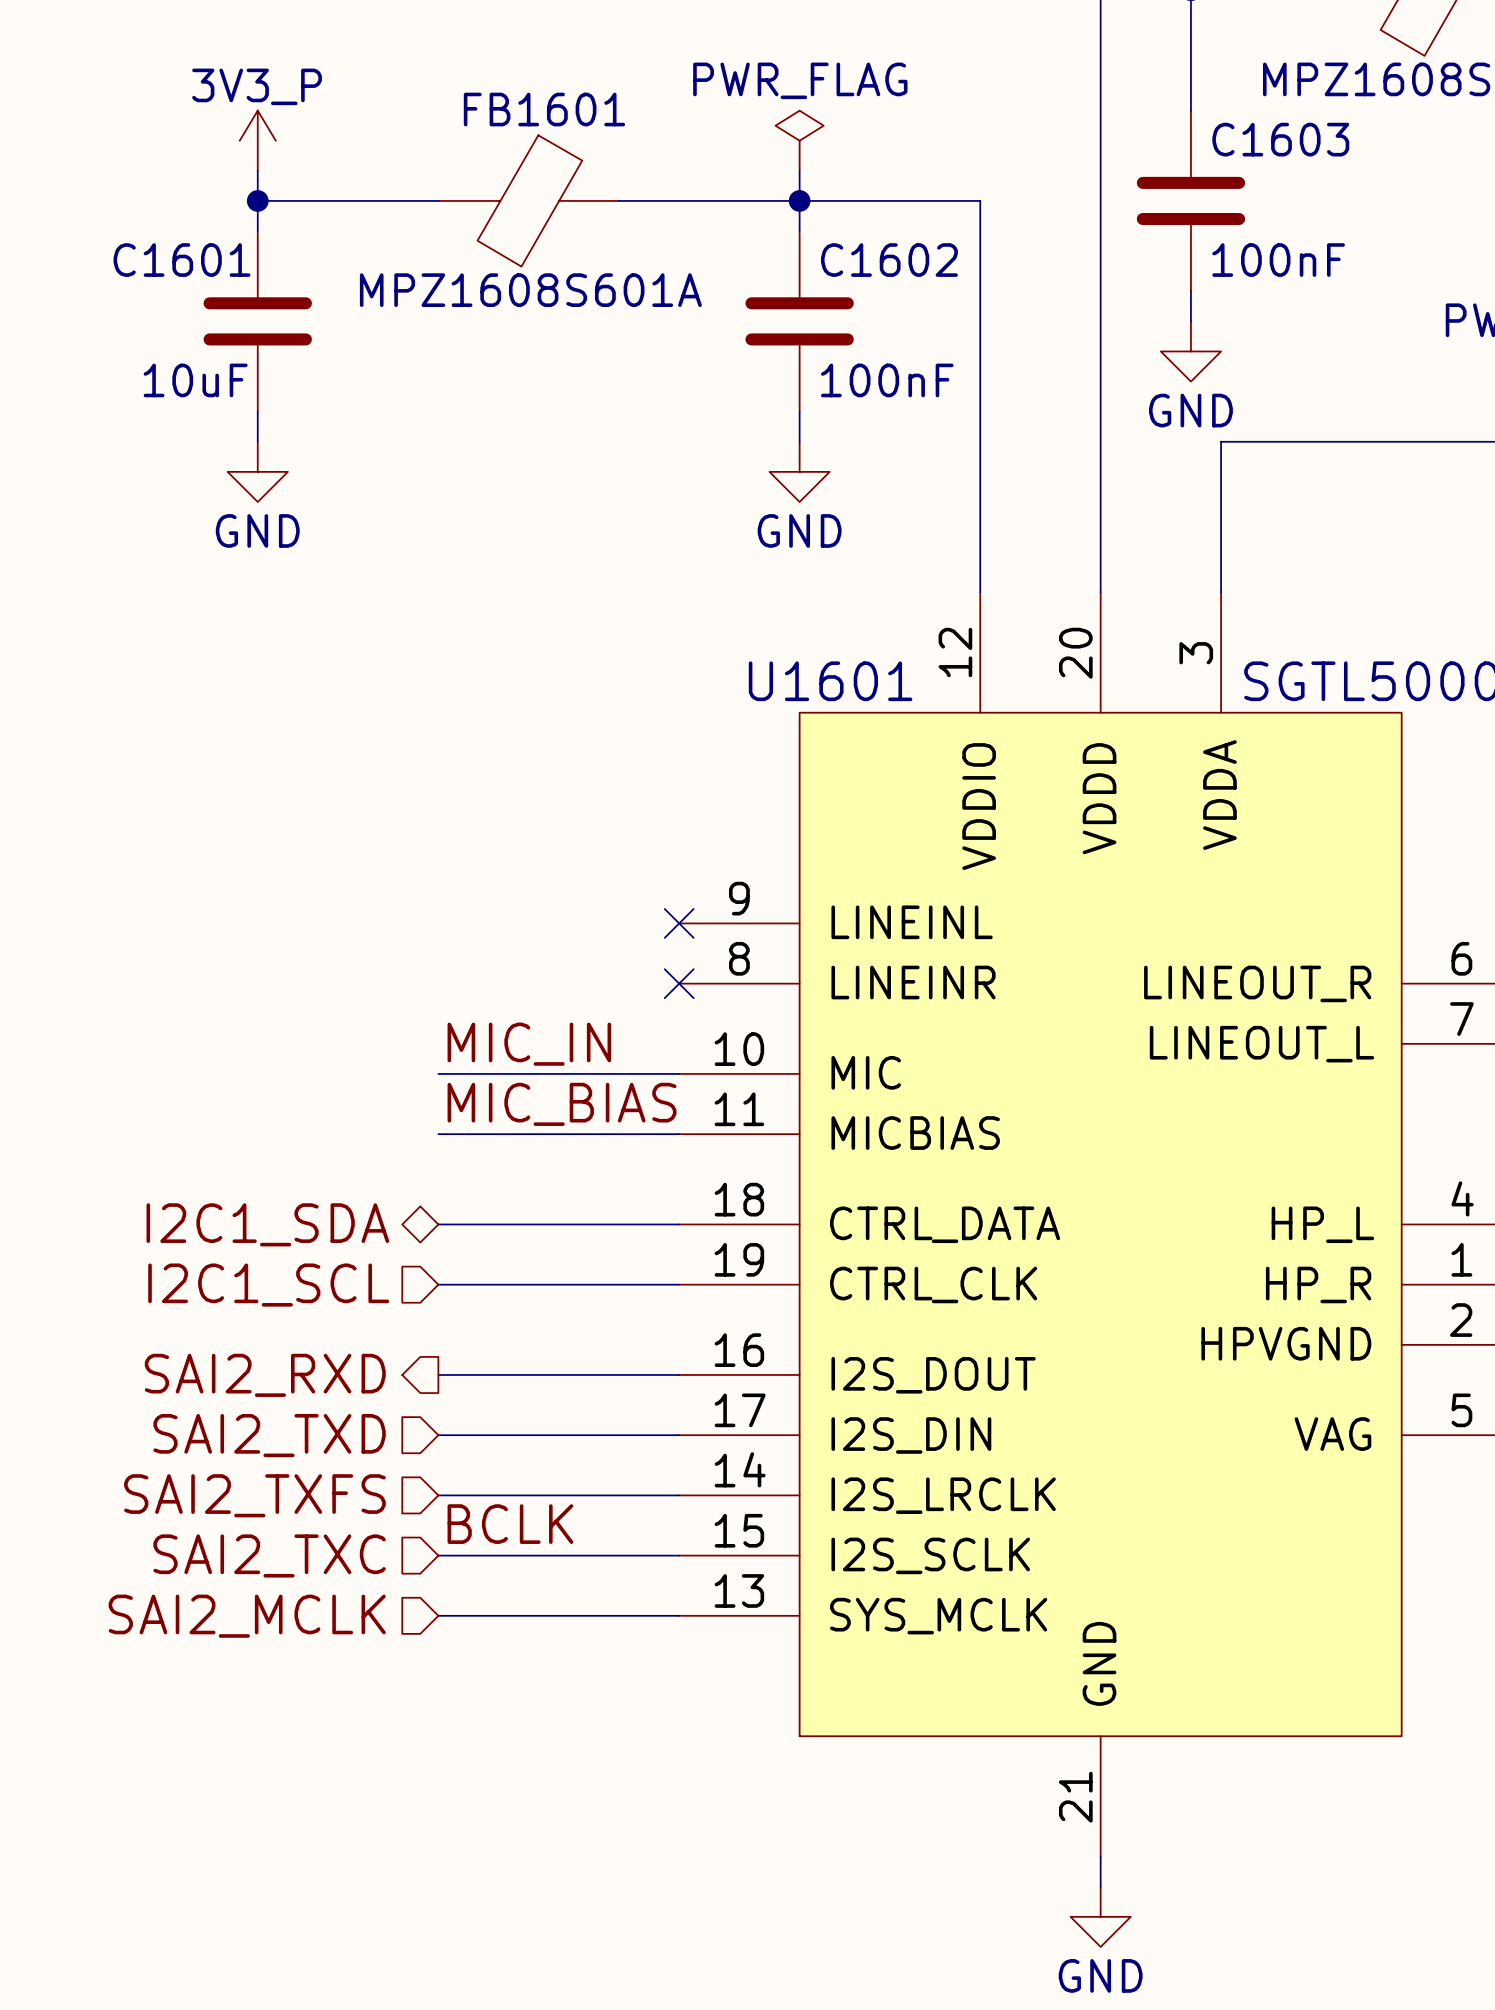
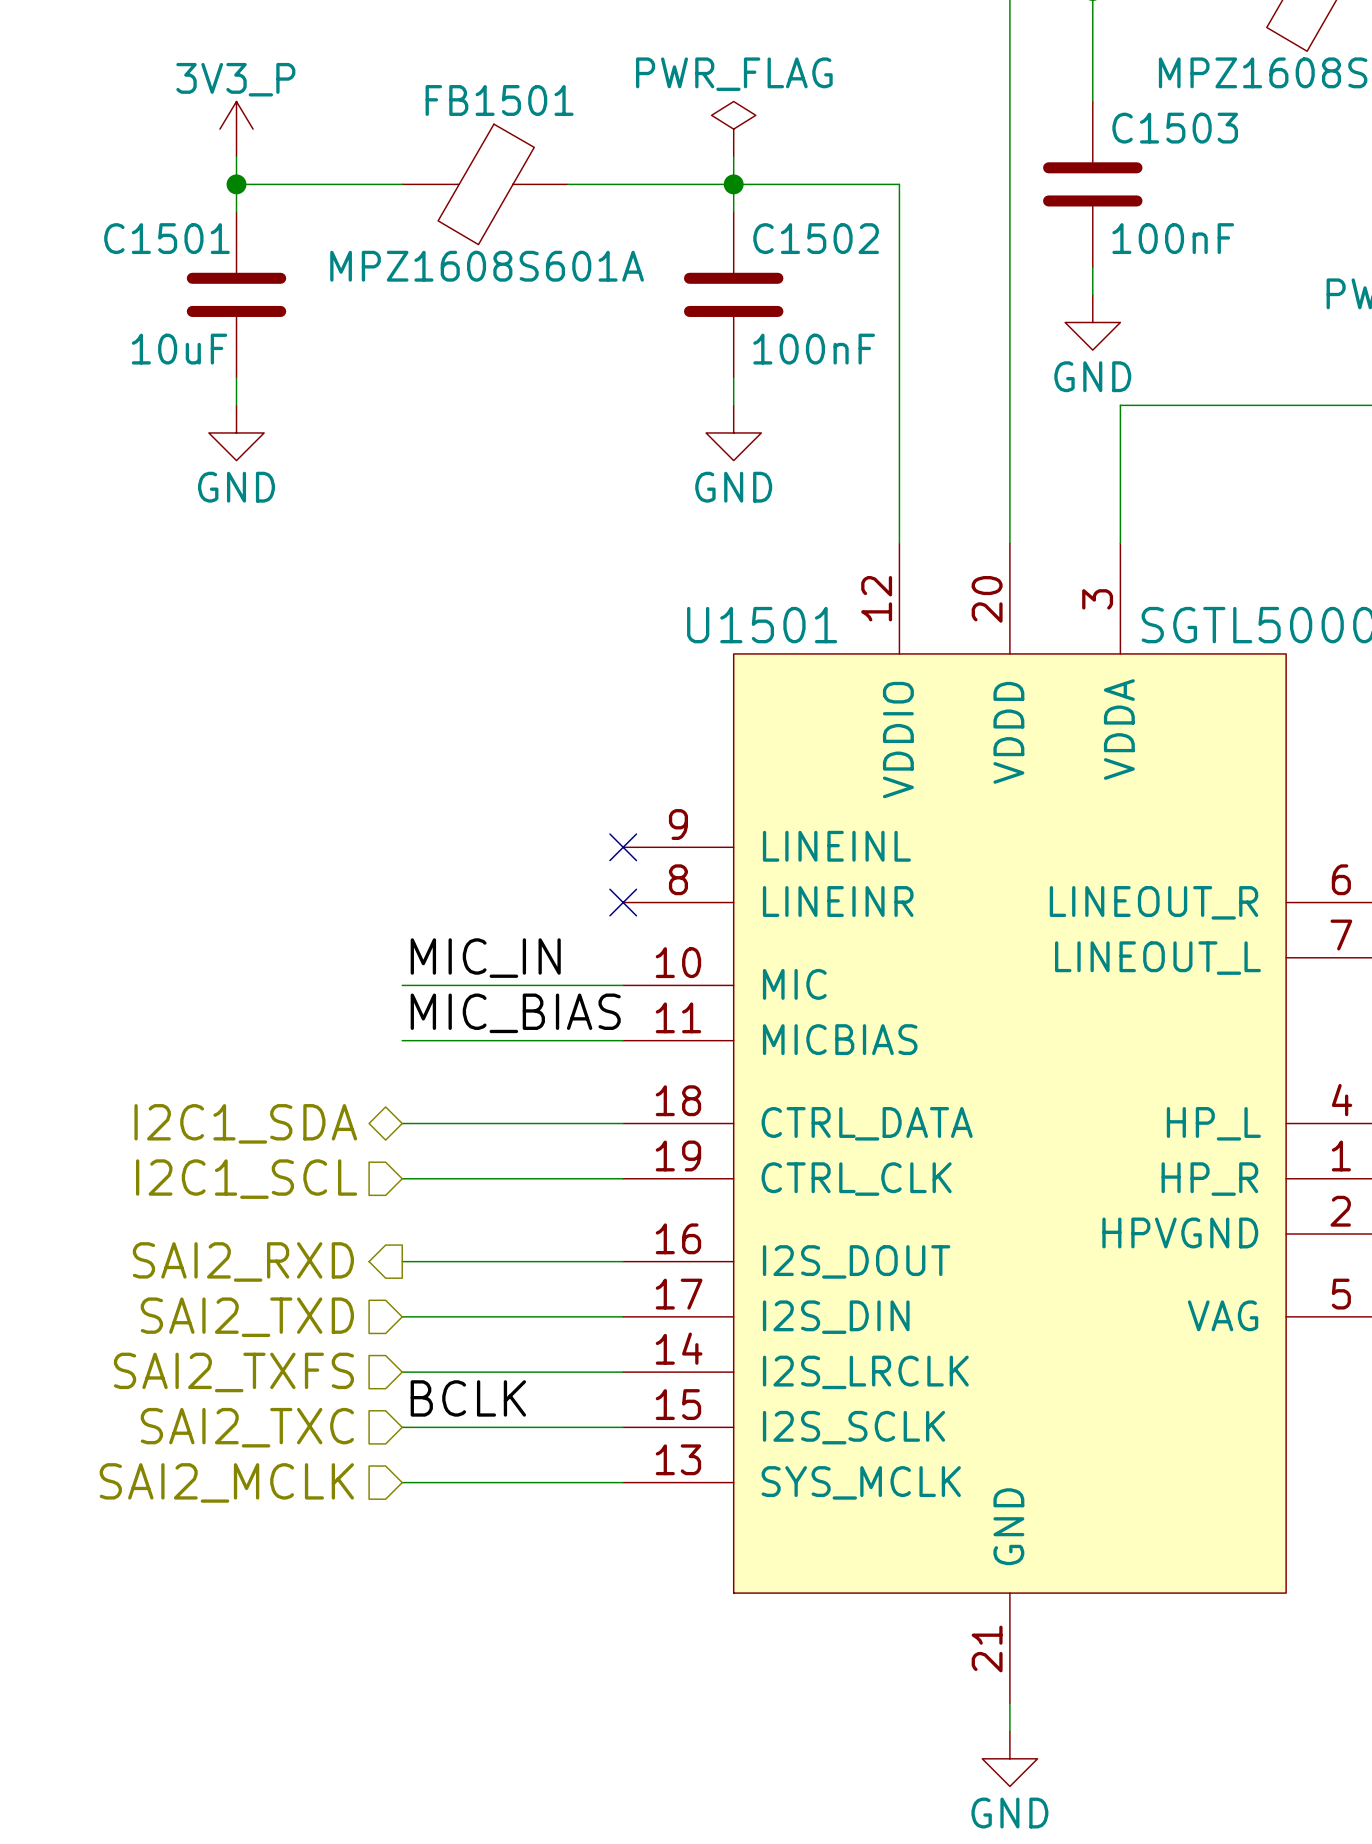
FB1601 name: FB1601 (544, 109) -> FB1501 (499, 100)
C1603 name: C1603 (1280, 139) -> C1503 (1175, 128)
C1601 name: C1601 (182, 260) -> C1501 (167, 238)
C1602 name: C1602 (889, 260) -> C1502 (816, 238)
U1601 name: U1601 (830, 681) -> U1501 (762, 625)

